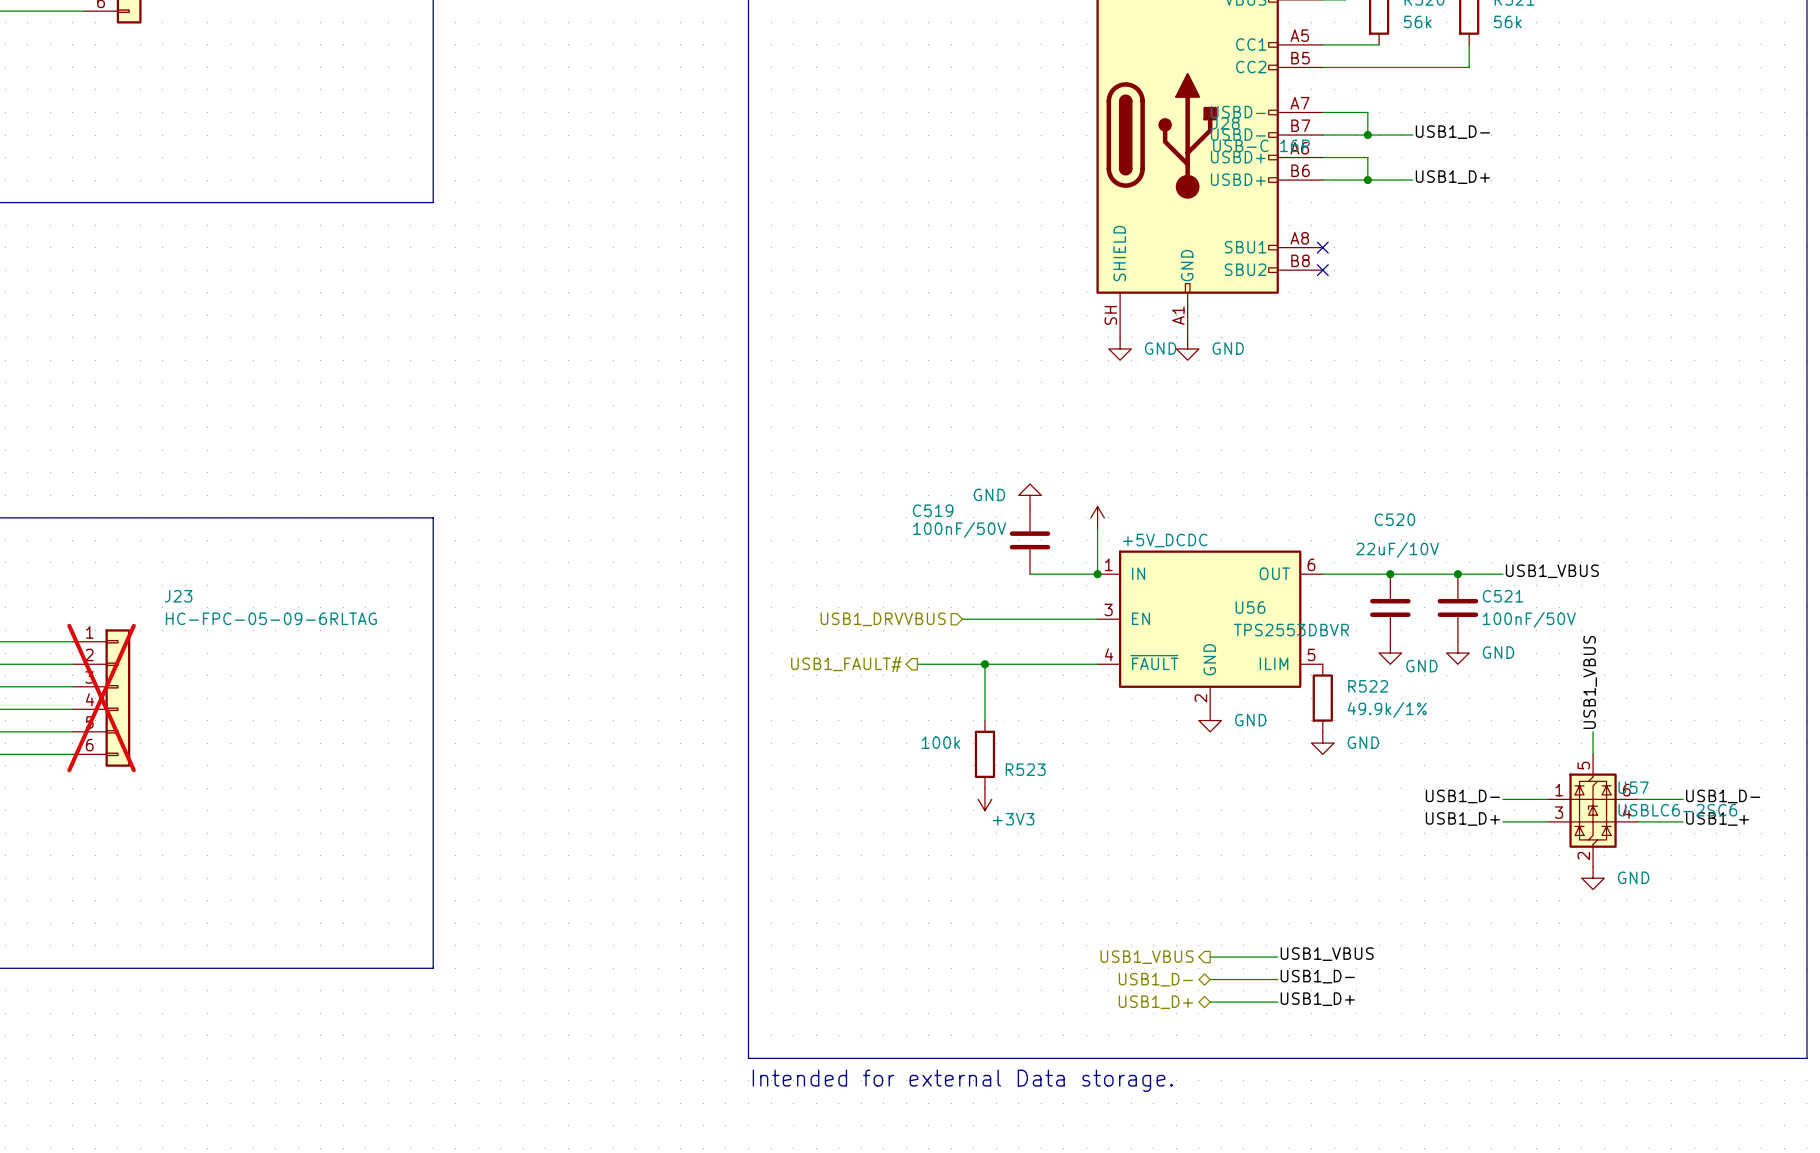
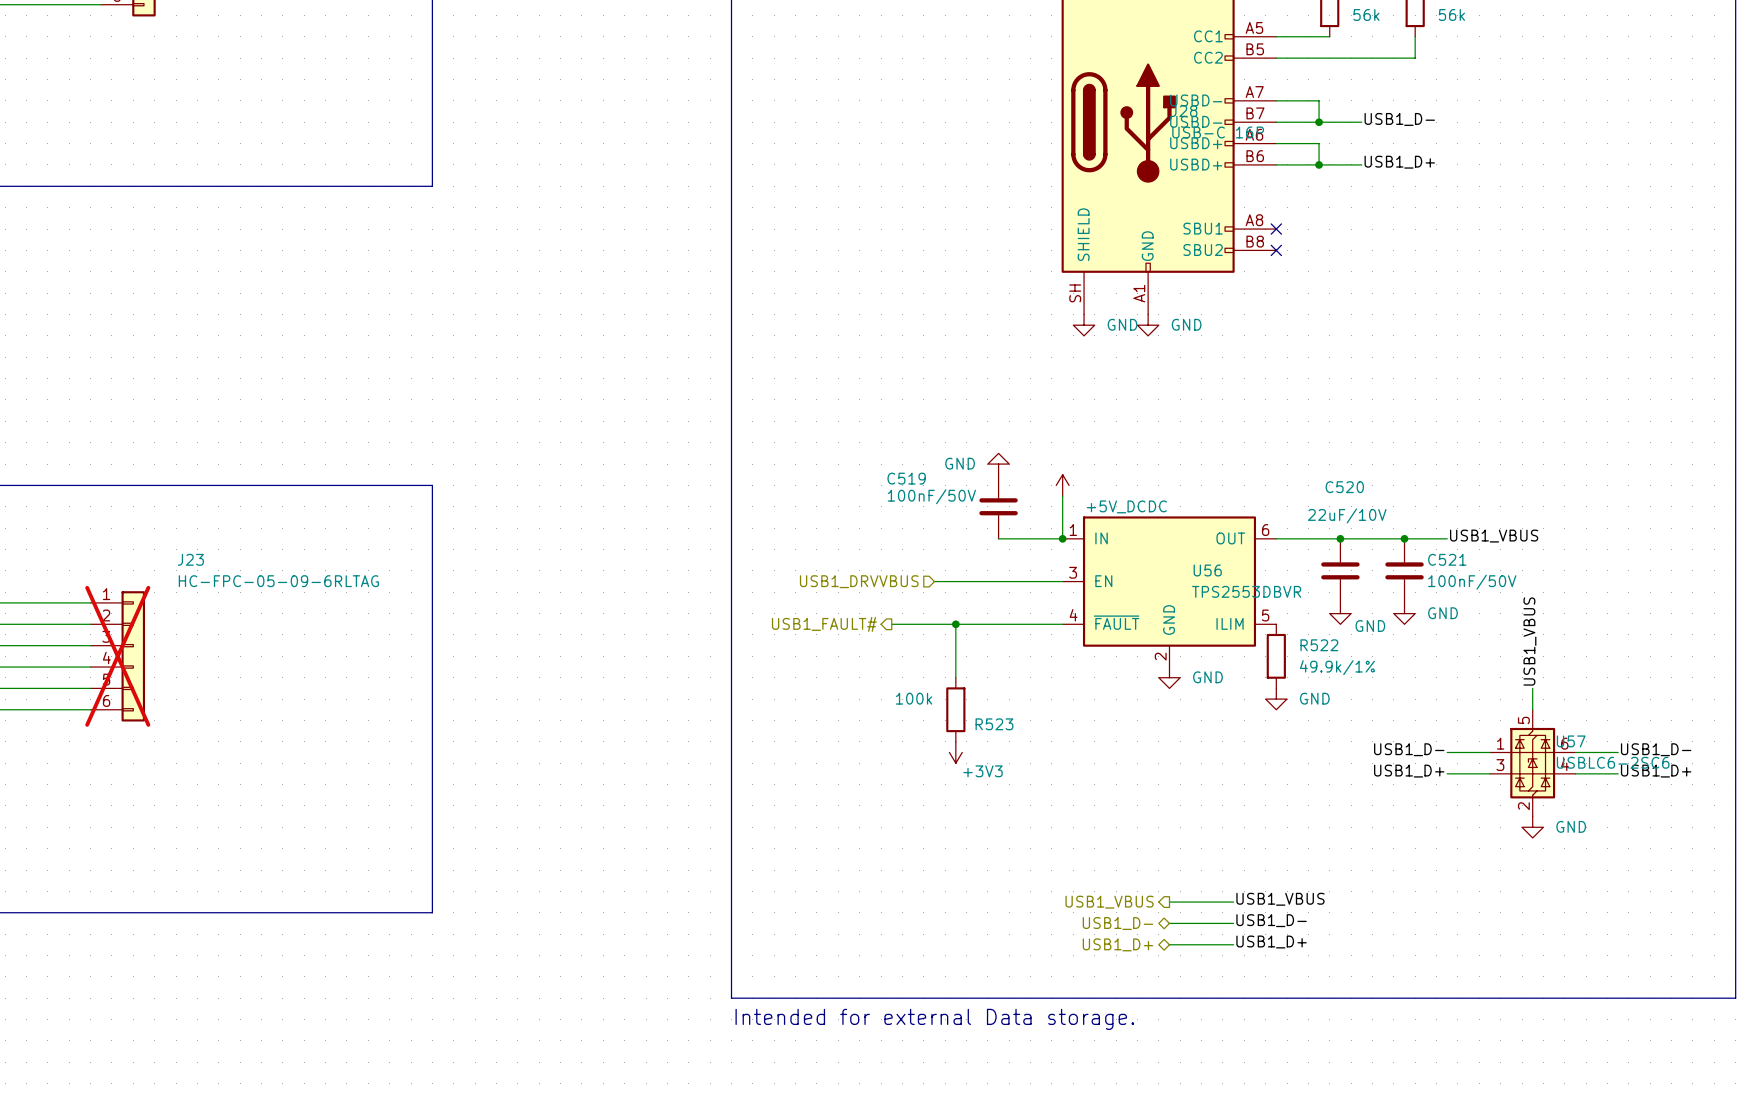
label: USB1_+ (1717, 818) -> USB1_D+ (1656, 771)

